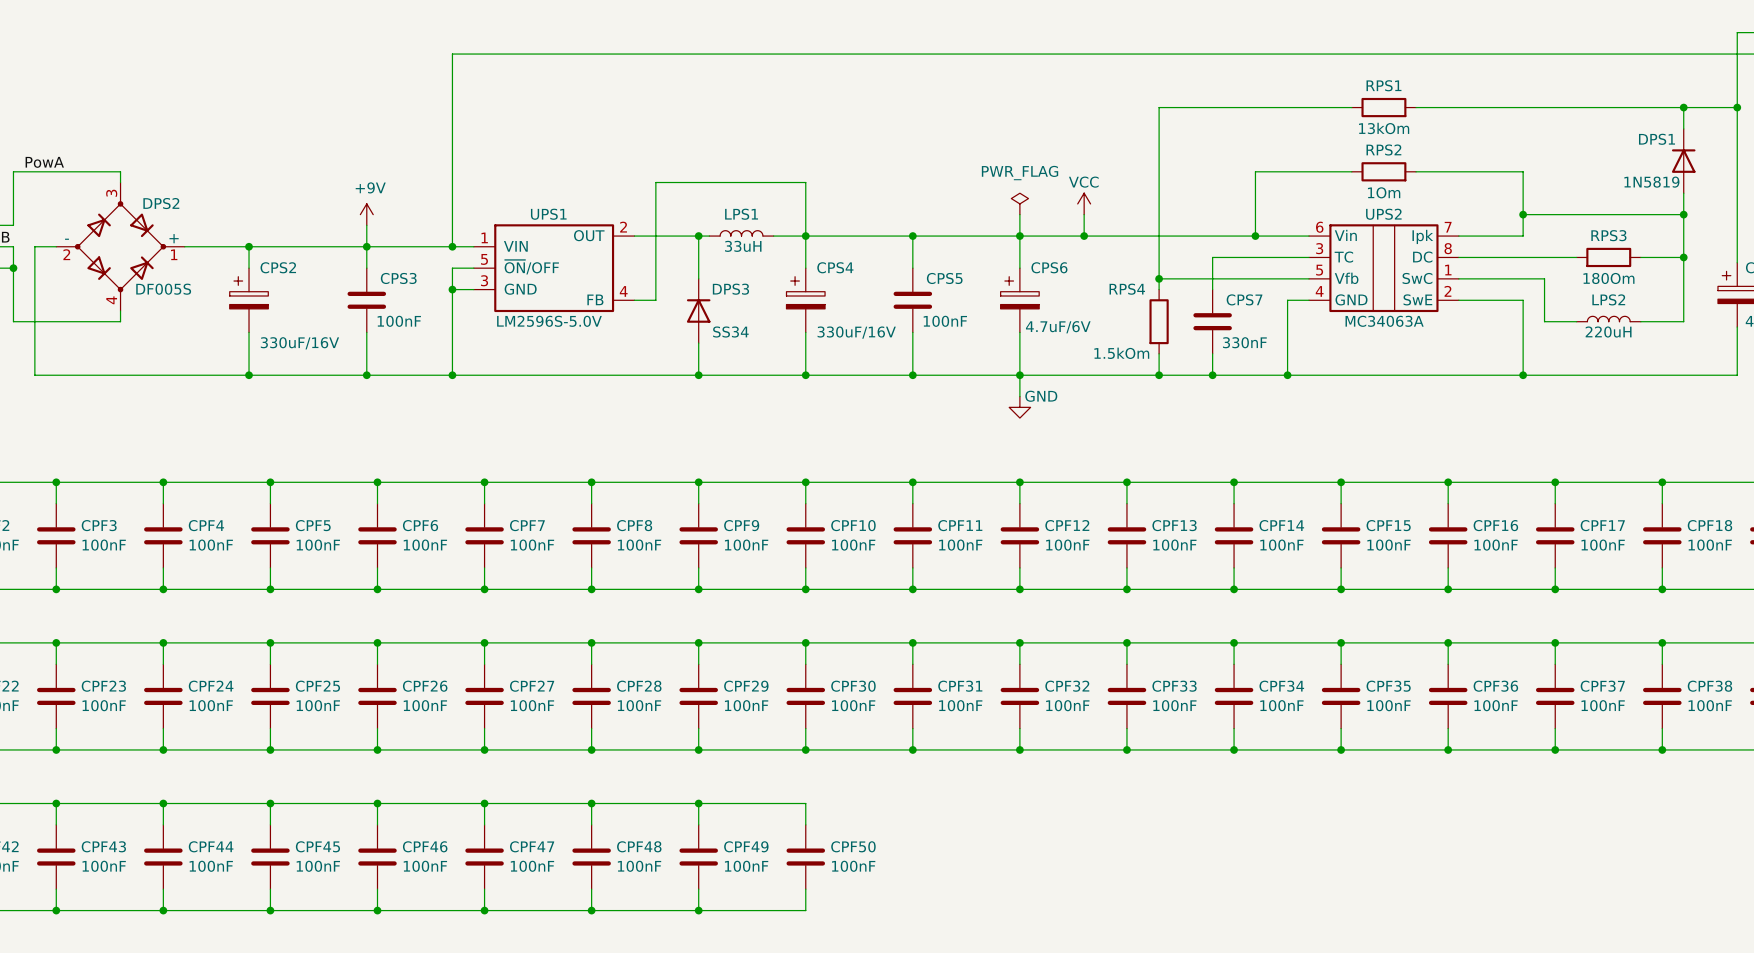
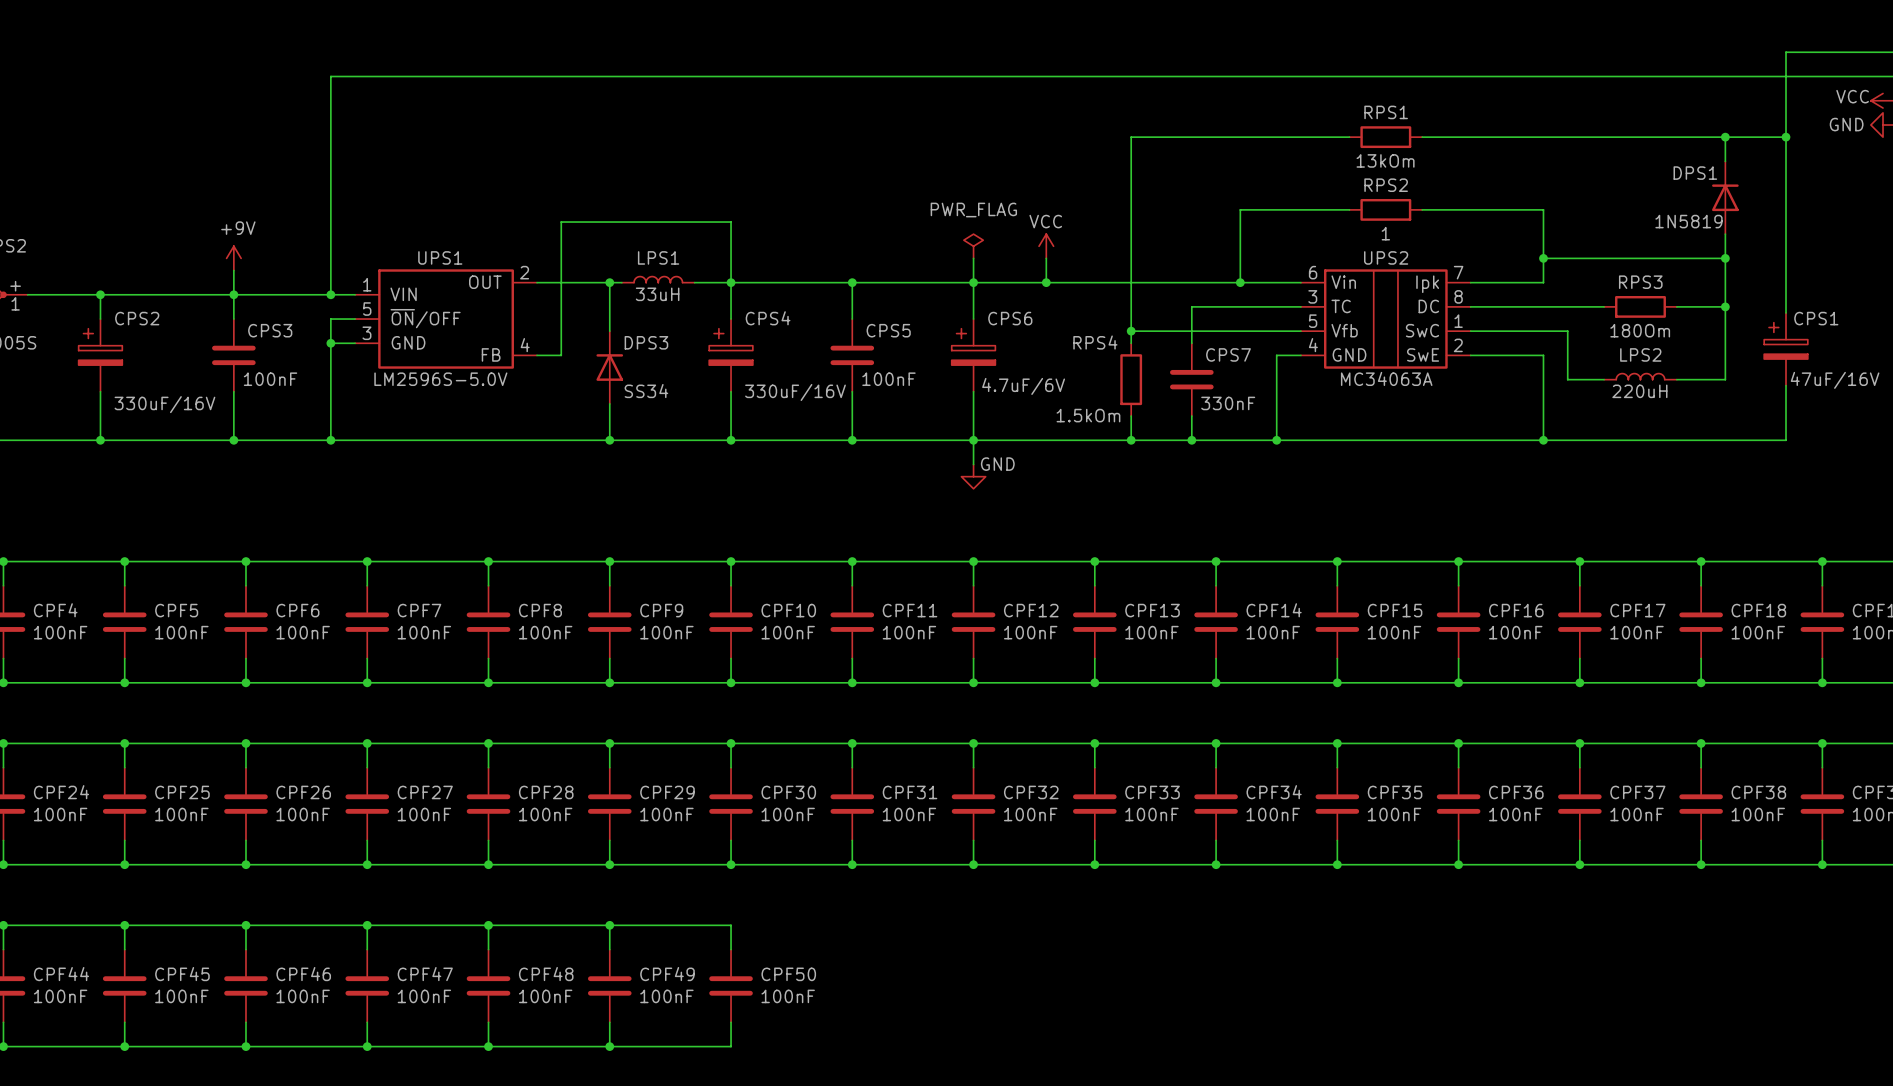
RPS2 value: 1Om (1384, 192) -> 1 (1385, 233)

